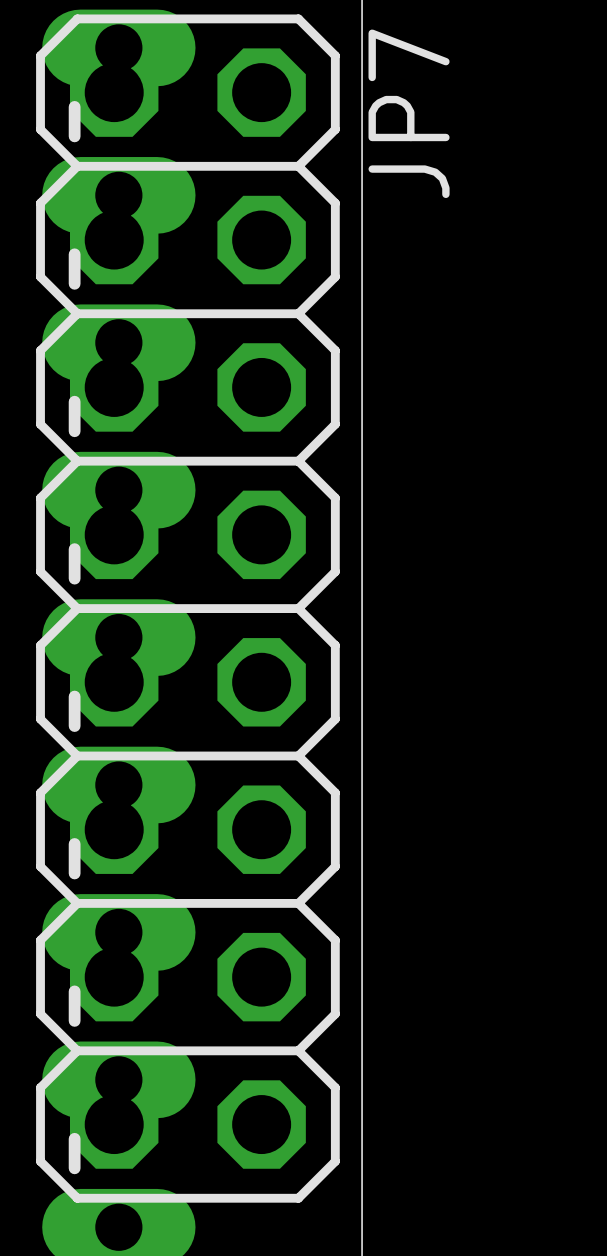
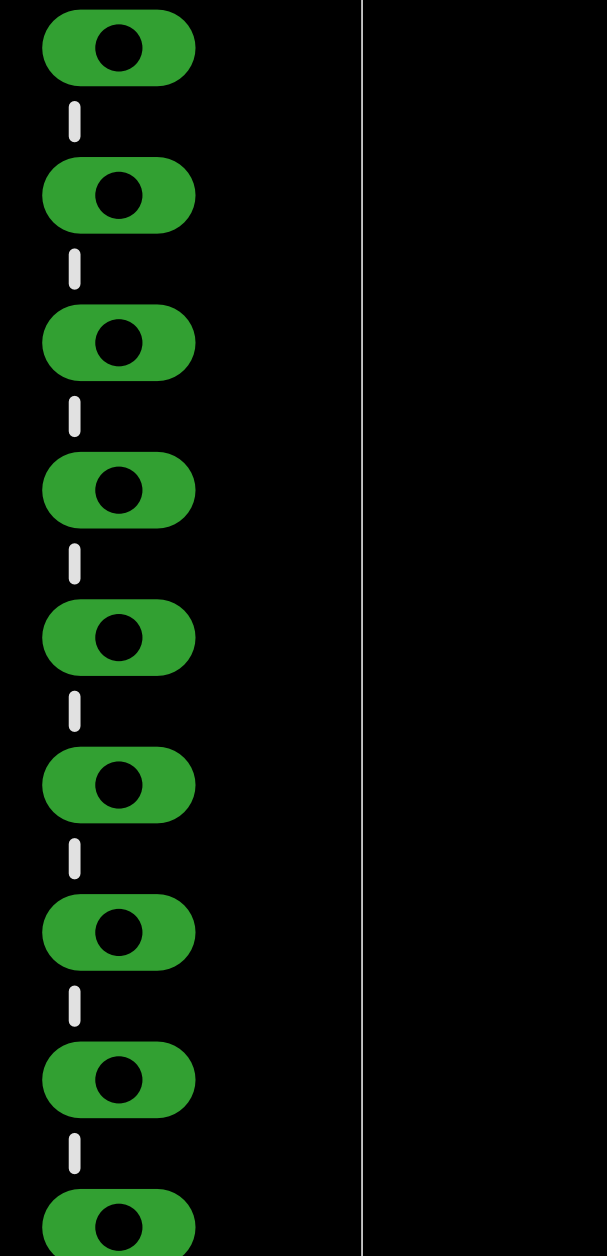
JP7: (187, 608) -> none

